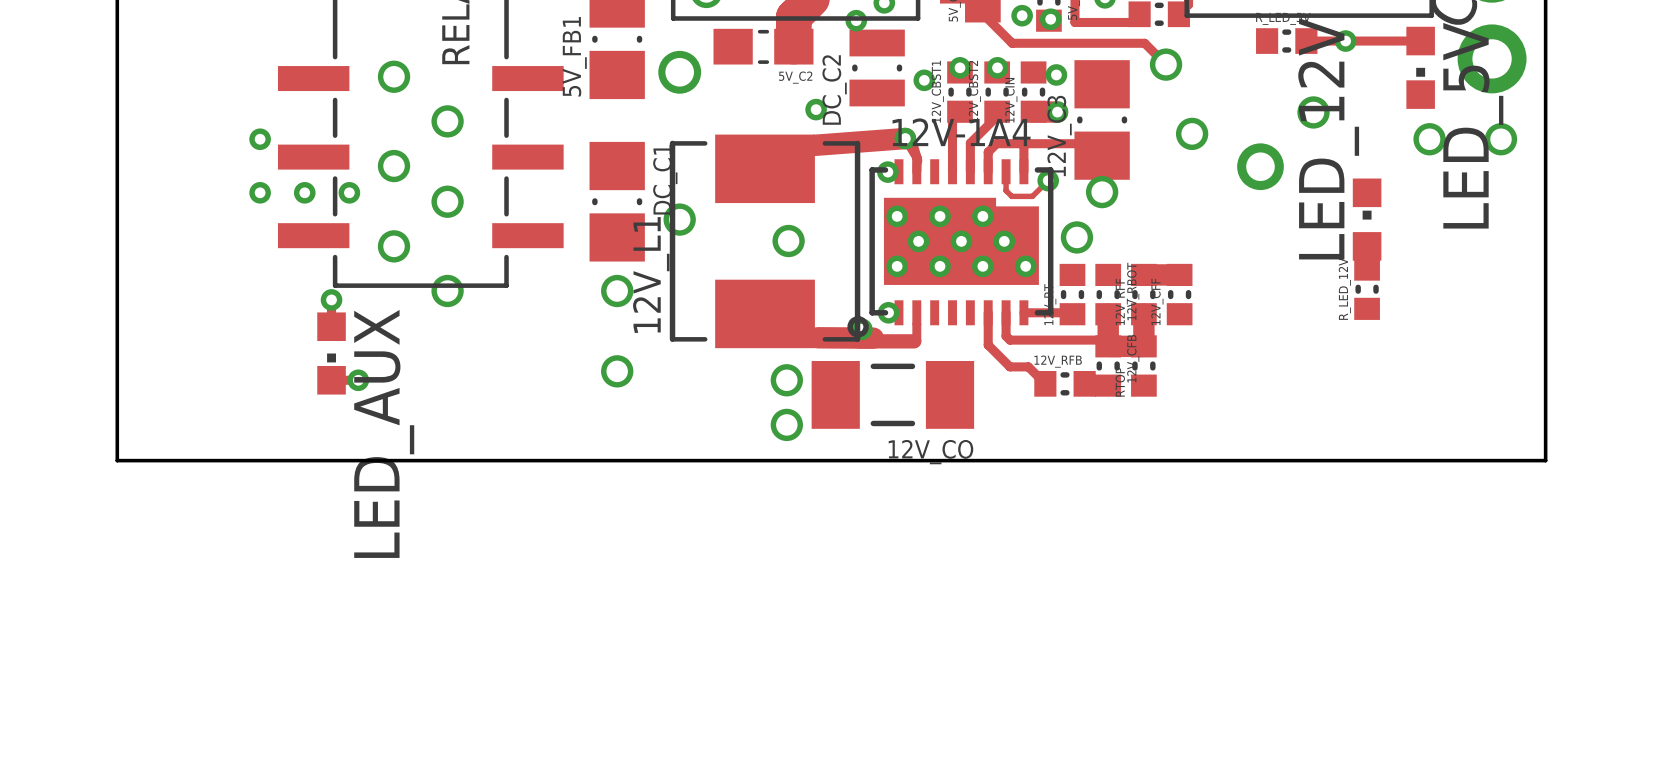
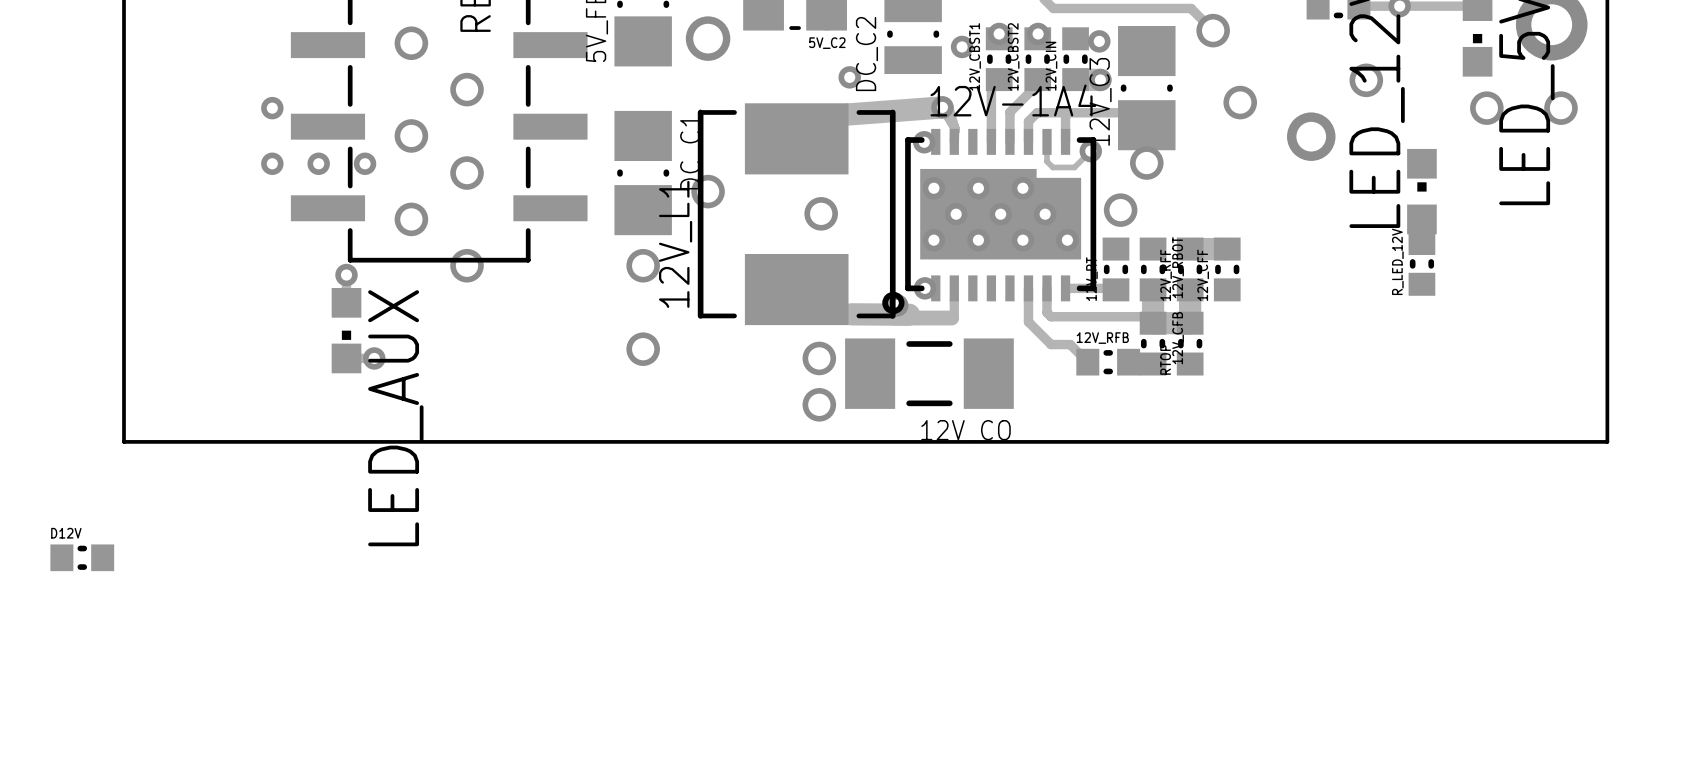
D12V: none -> (82, 557)

